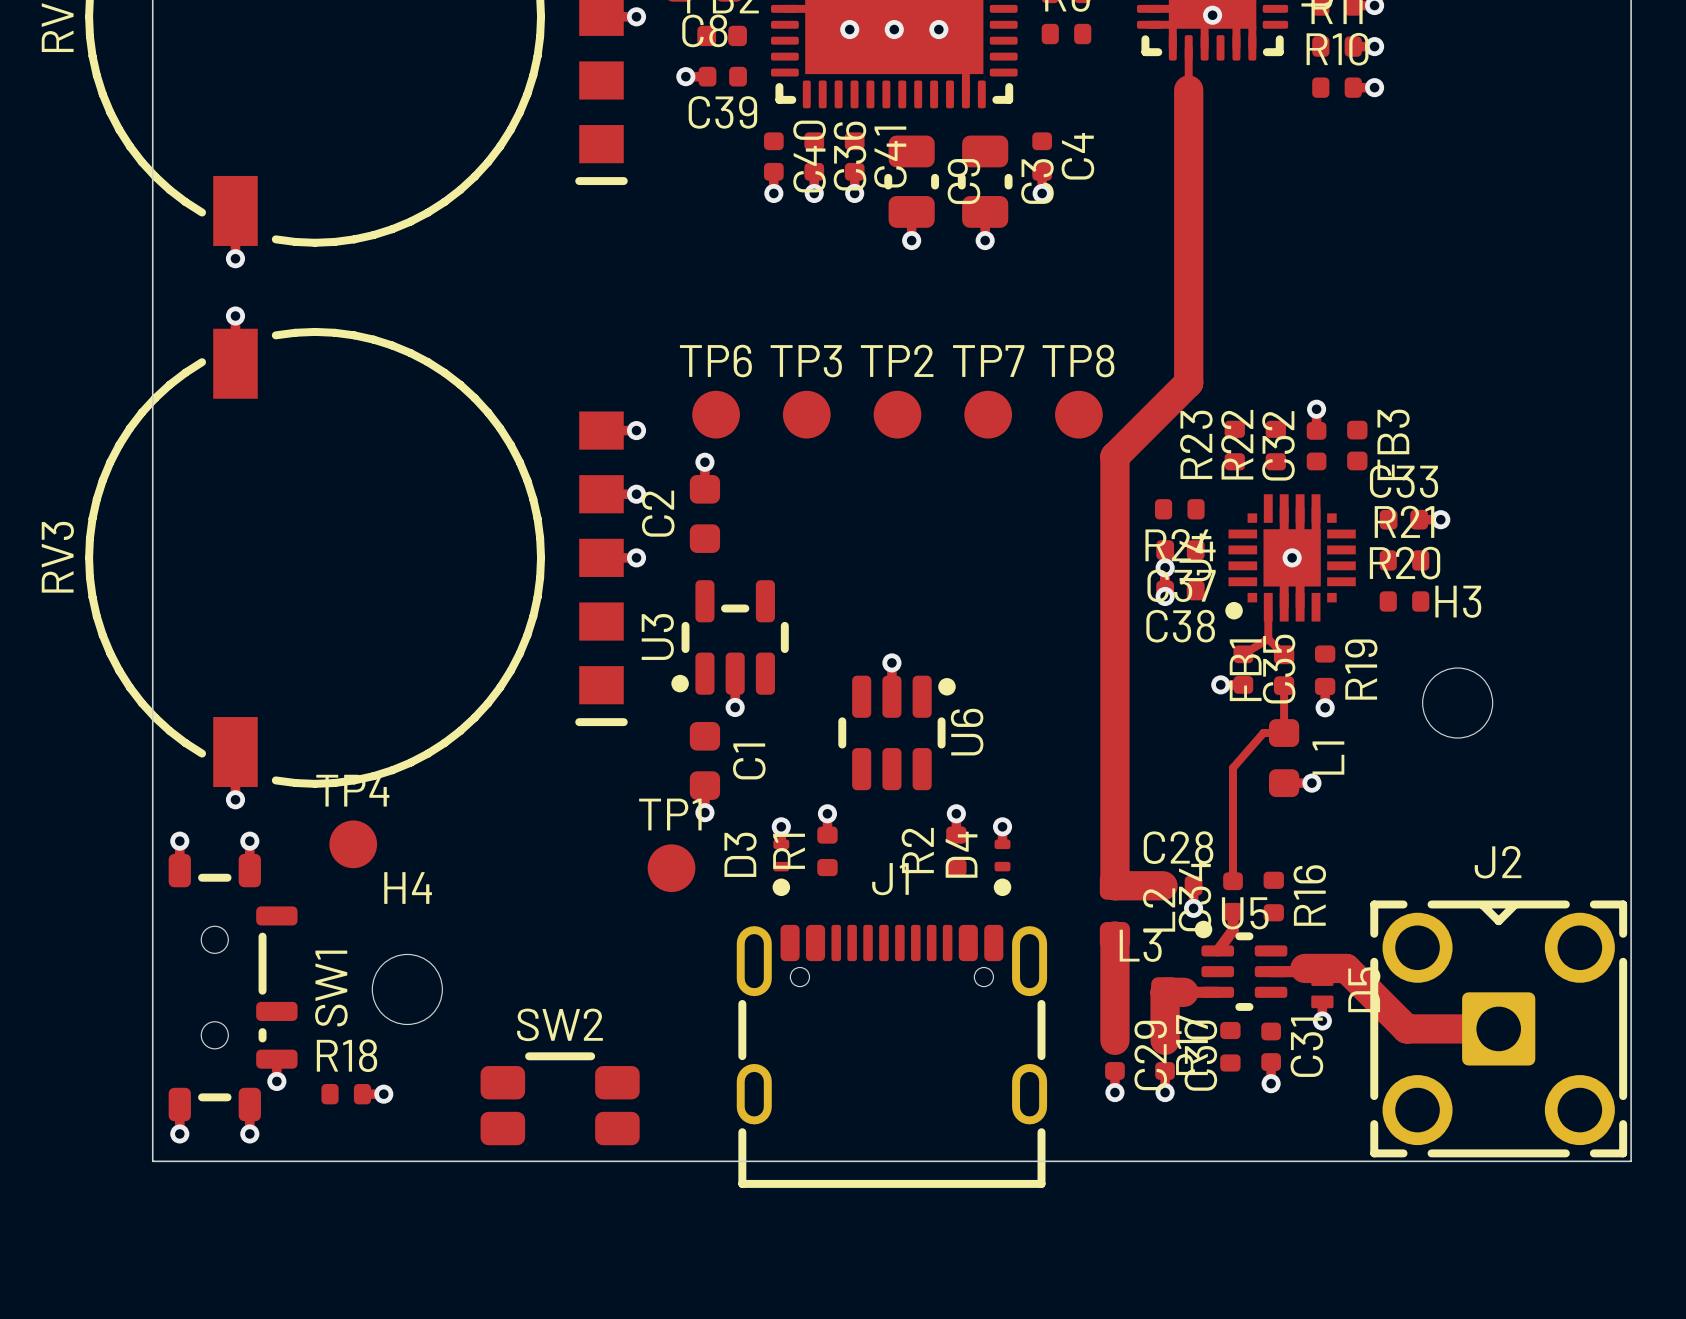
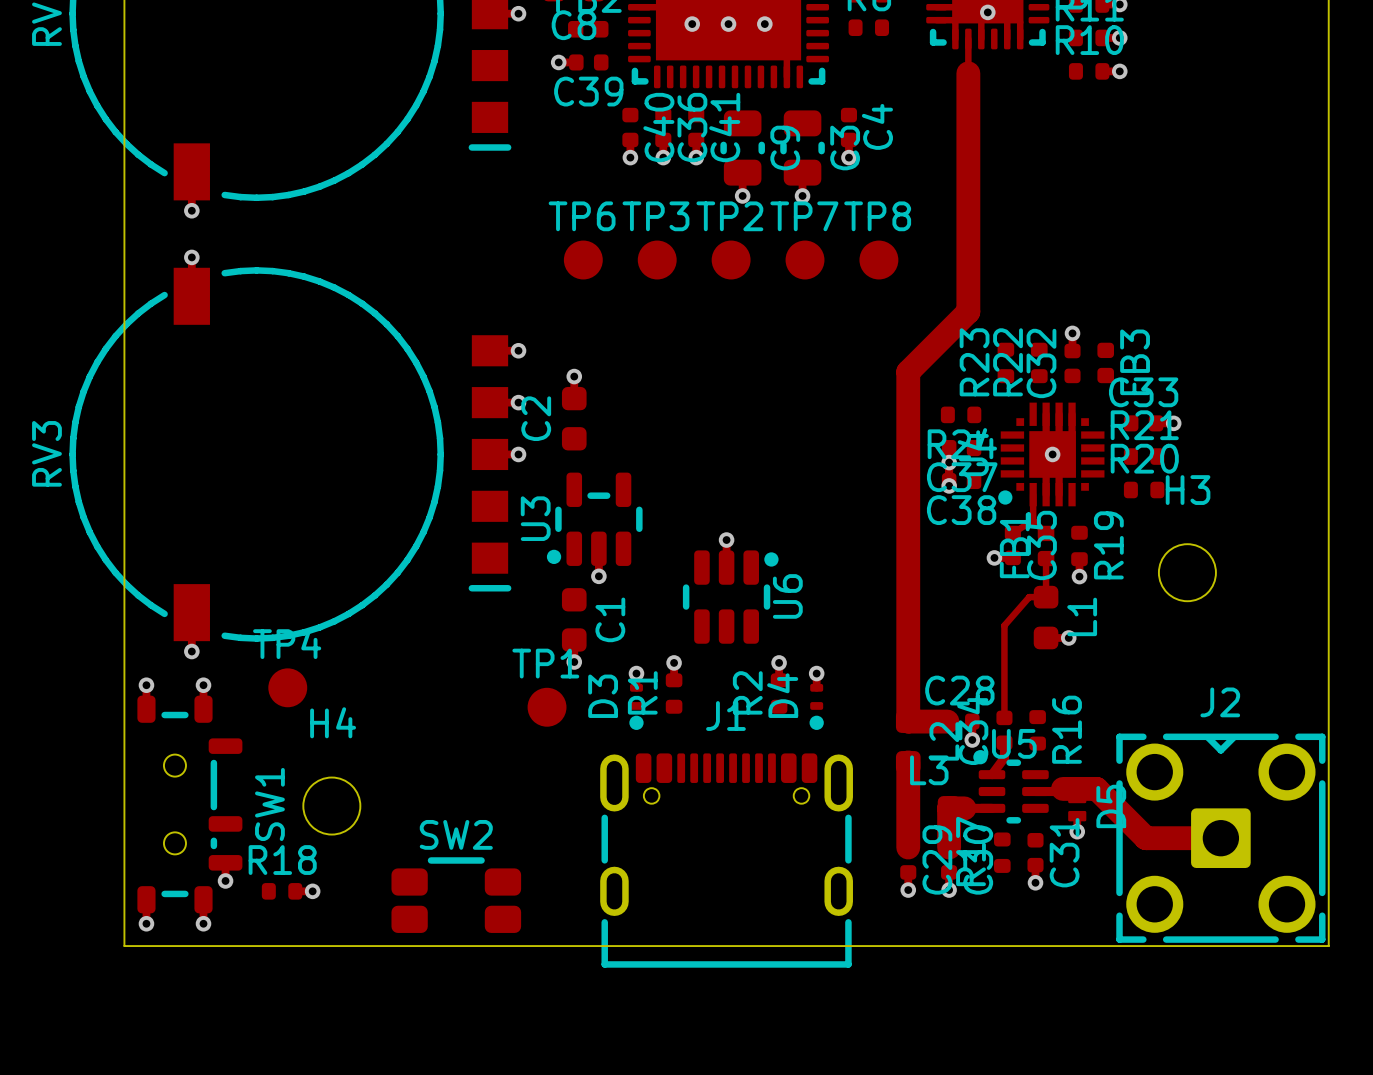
TP6 position: (716, 414) -> (583, 260)
TP3 position: (806, 414) -> (657, 260)
TP2 position: (897, 414) -> (731, 260)
TP7 position: (988, 414) -> (805, 260)
TP8 position: (1078, 414) -> (878, 260)

